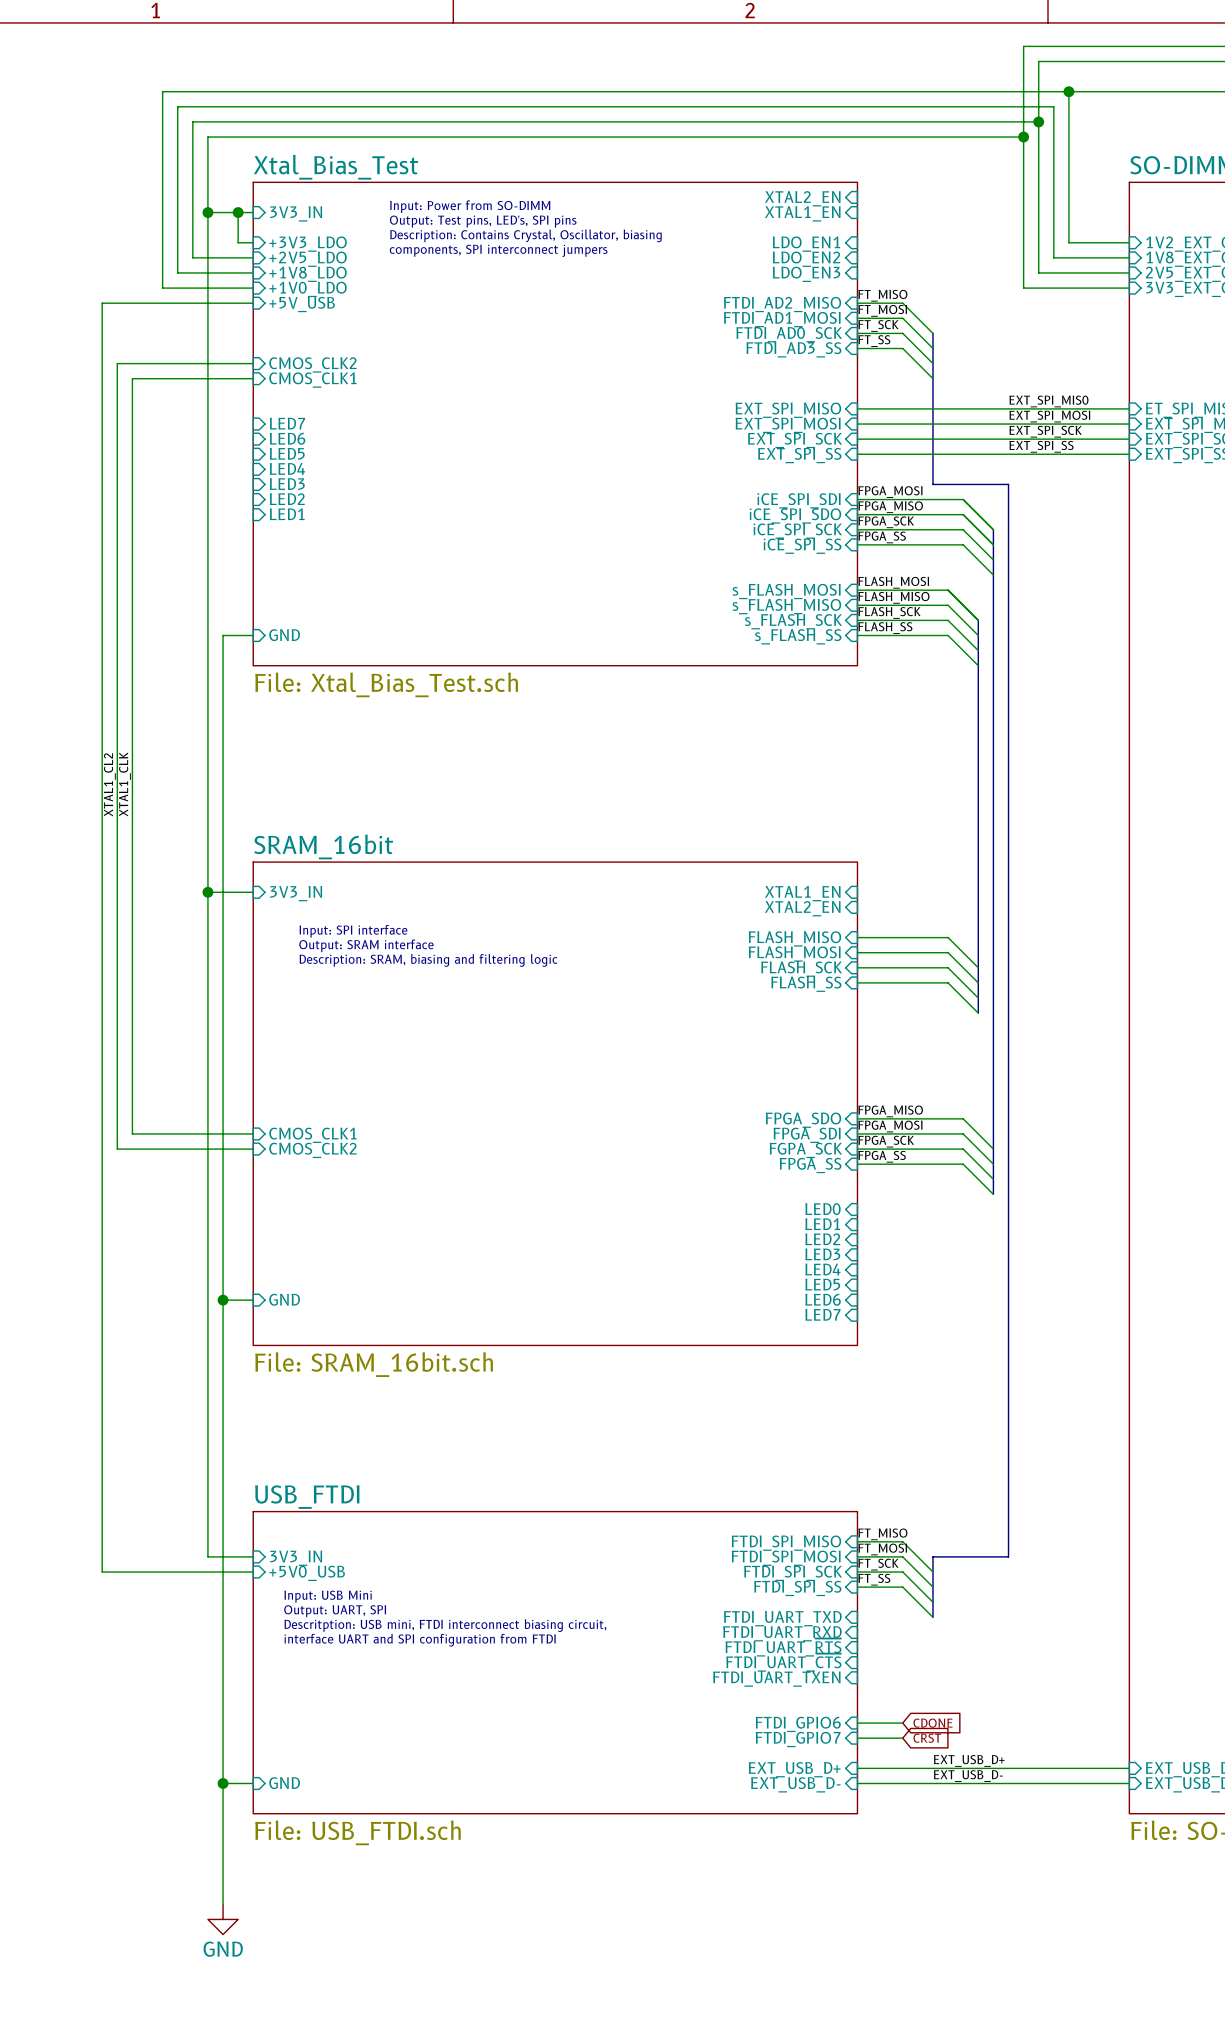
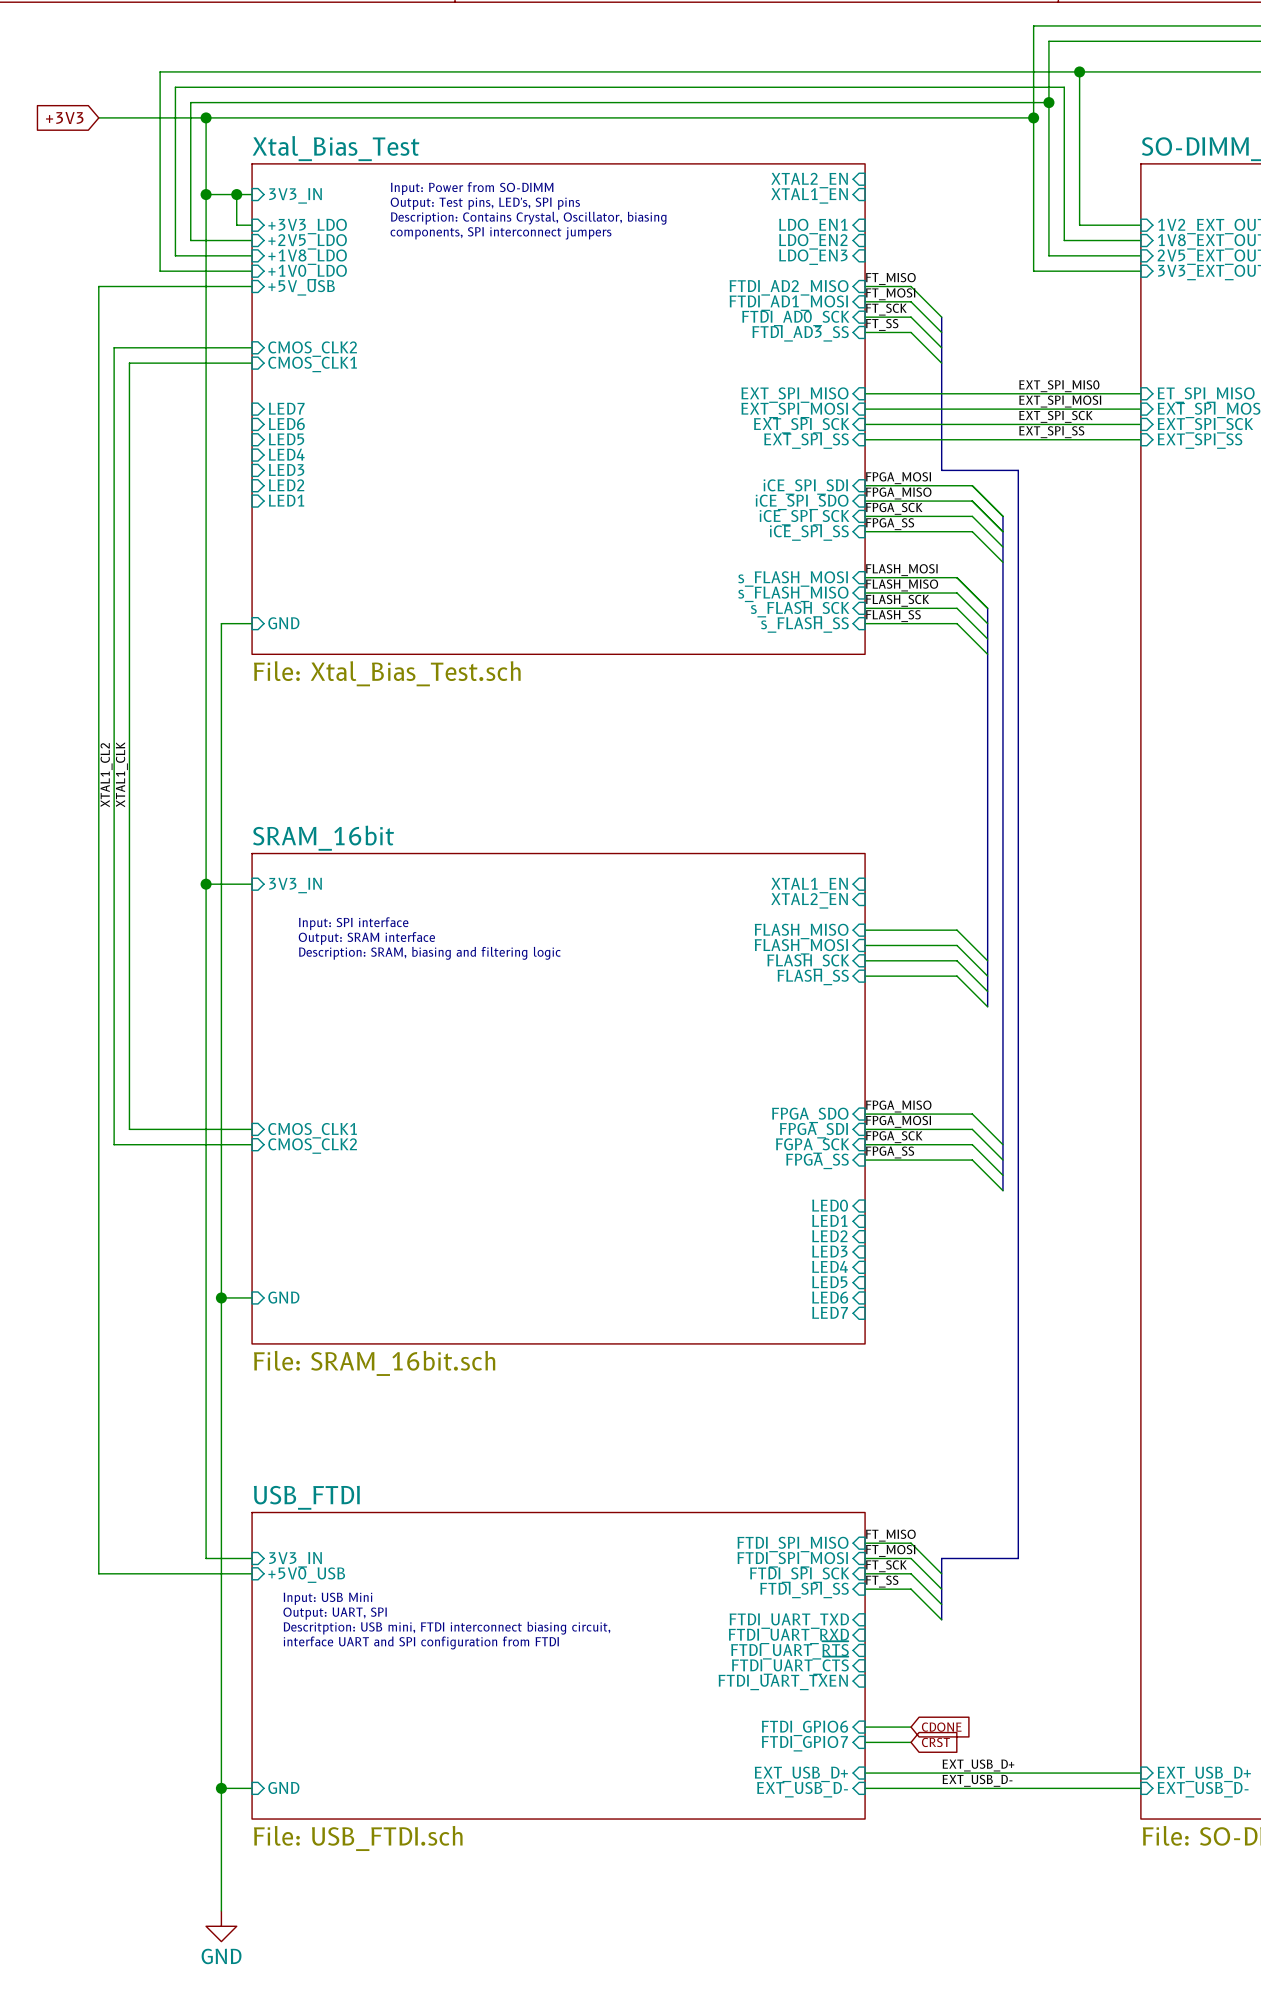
global label: none -> +3V3 (64, 118)
wire: none -> (98, 117) (206, 117)
junction: none -> (206, 117)

